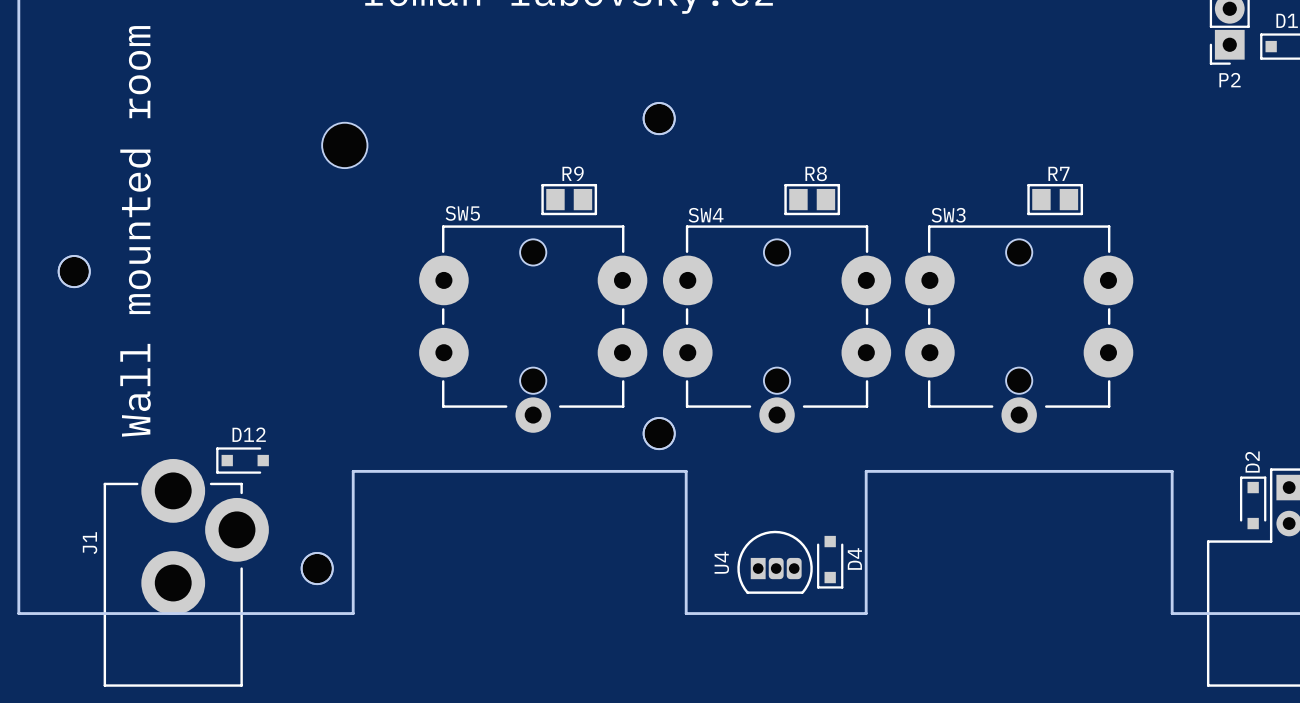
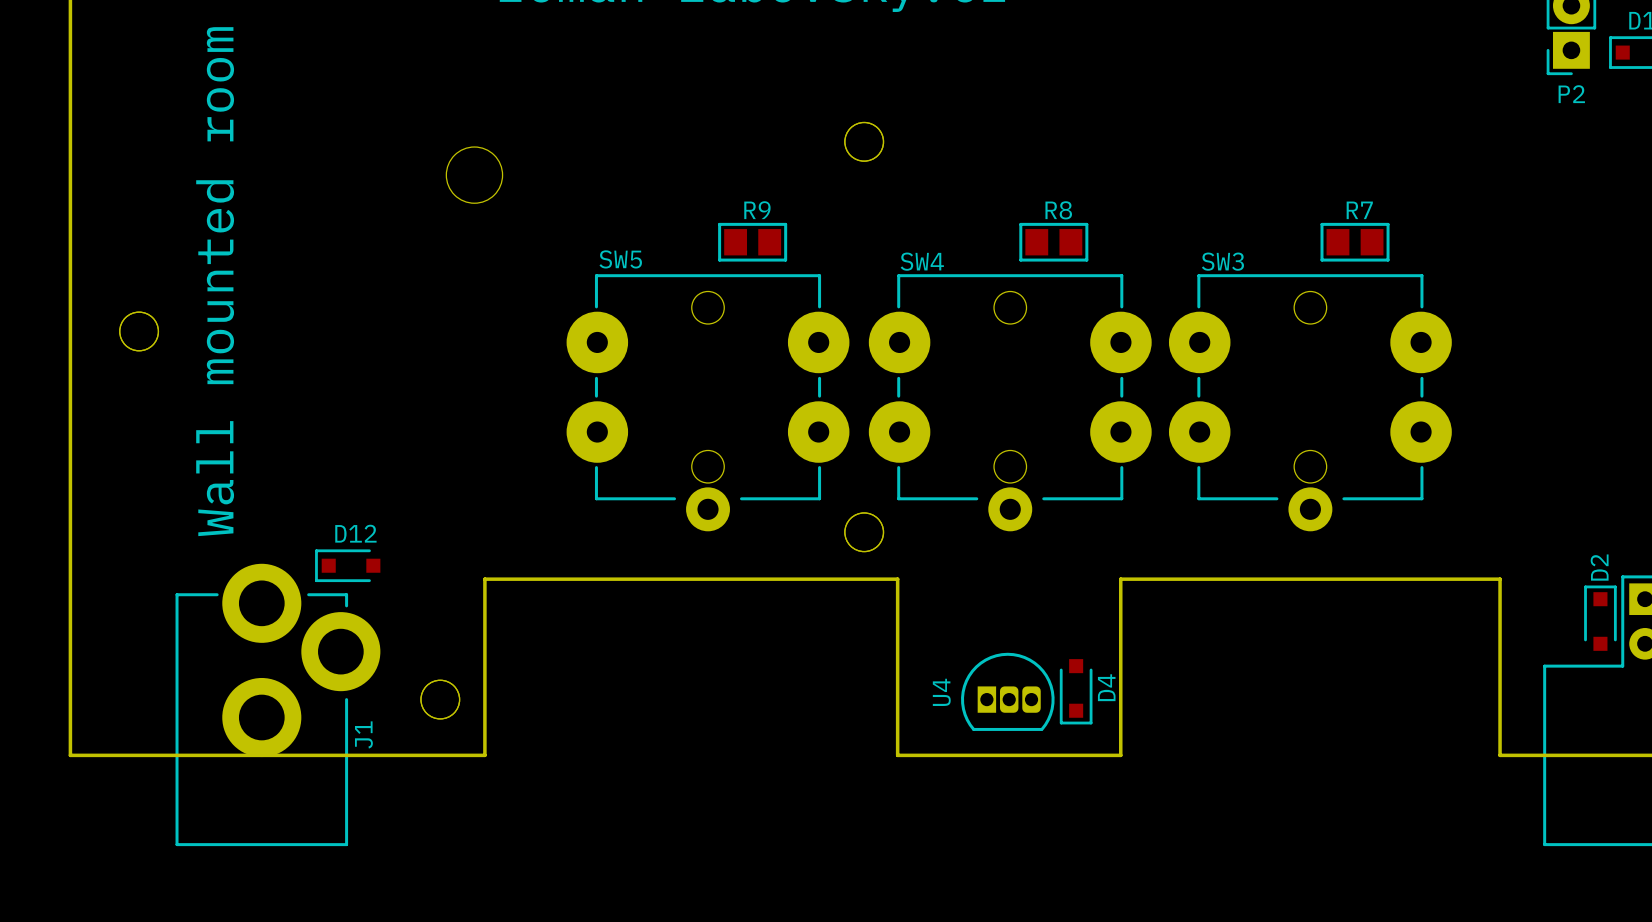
J1 name position: J1 (90, 543) -> J1 (363, 734)

